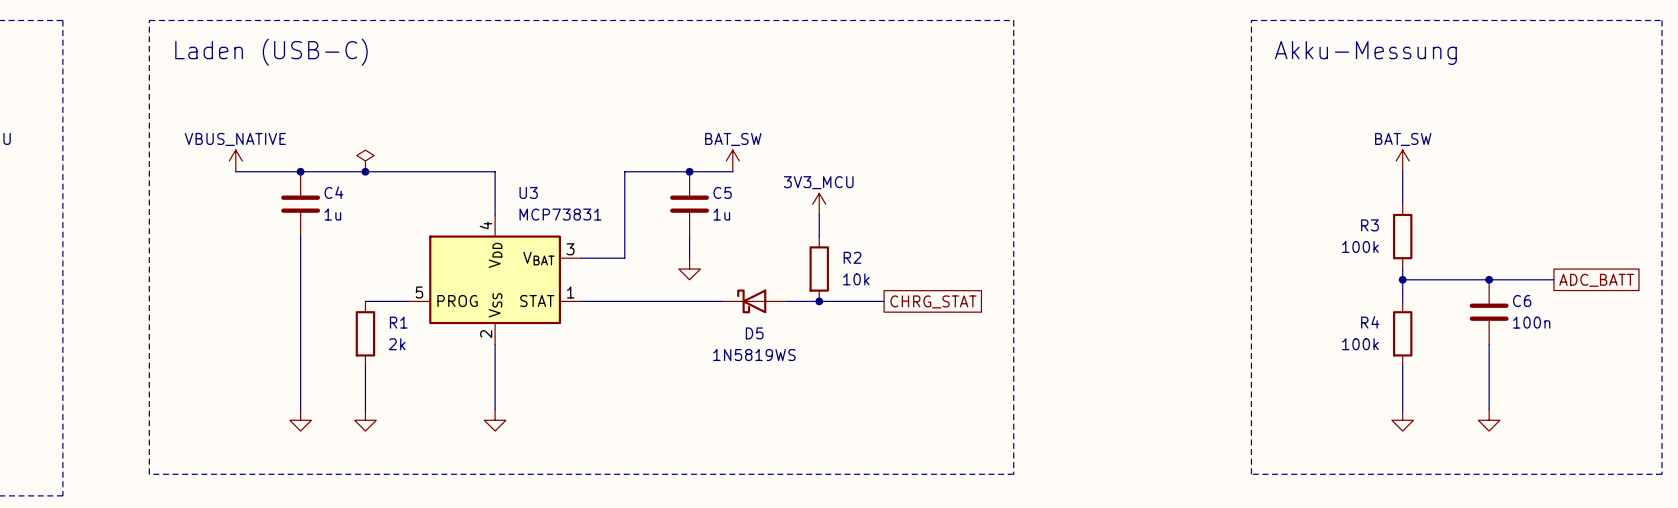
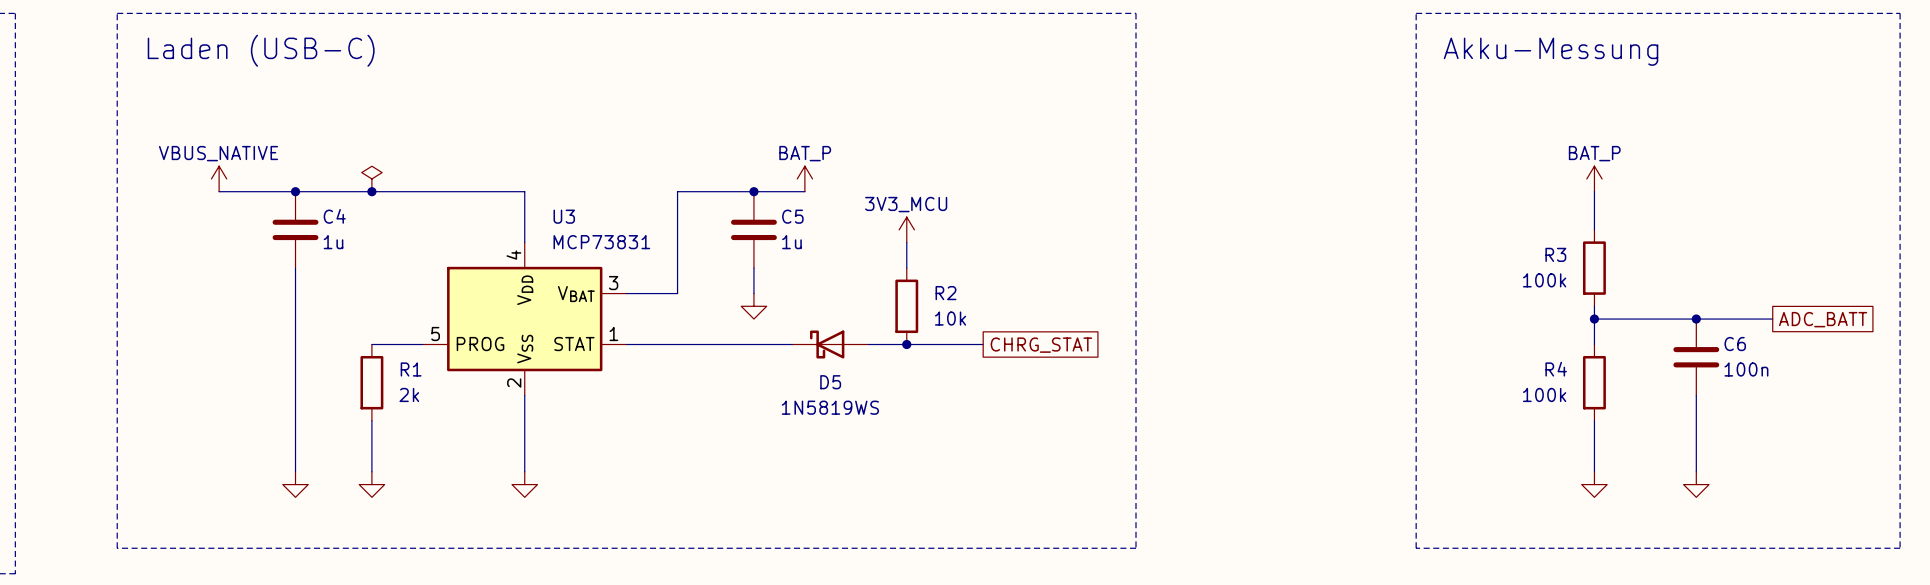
power symbol: BAT_SW (732, 160) -> BAT_P (804, 178)
power symbol: BAT_SW (1402, 160) -> BAT_P (1594, 178)

